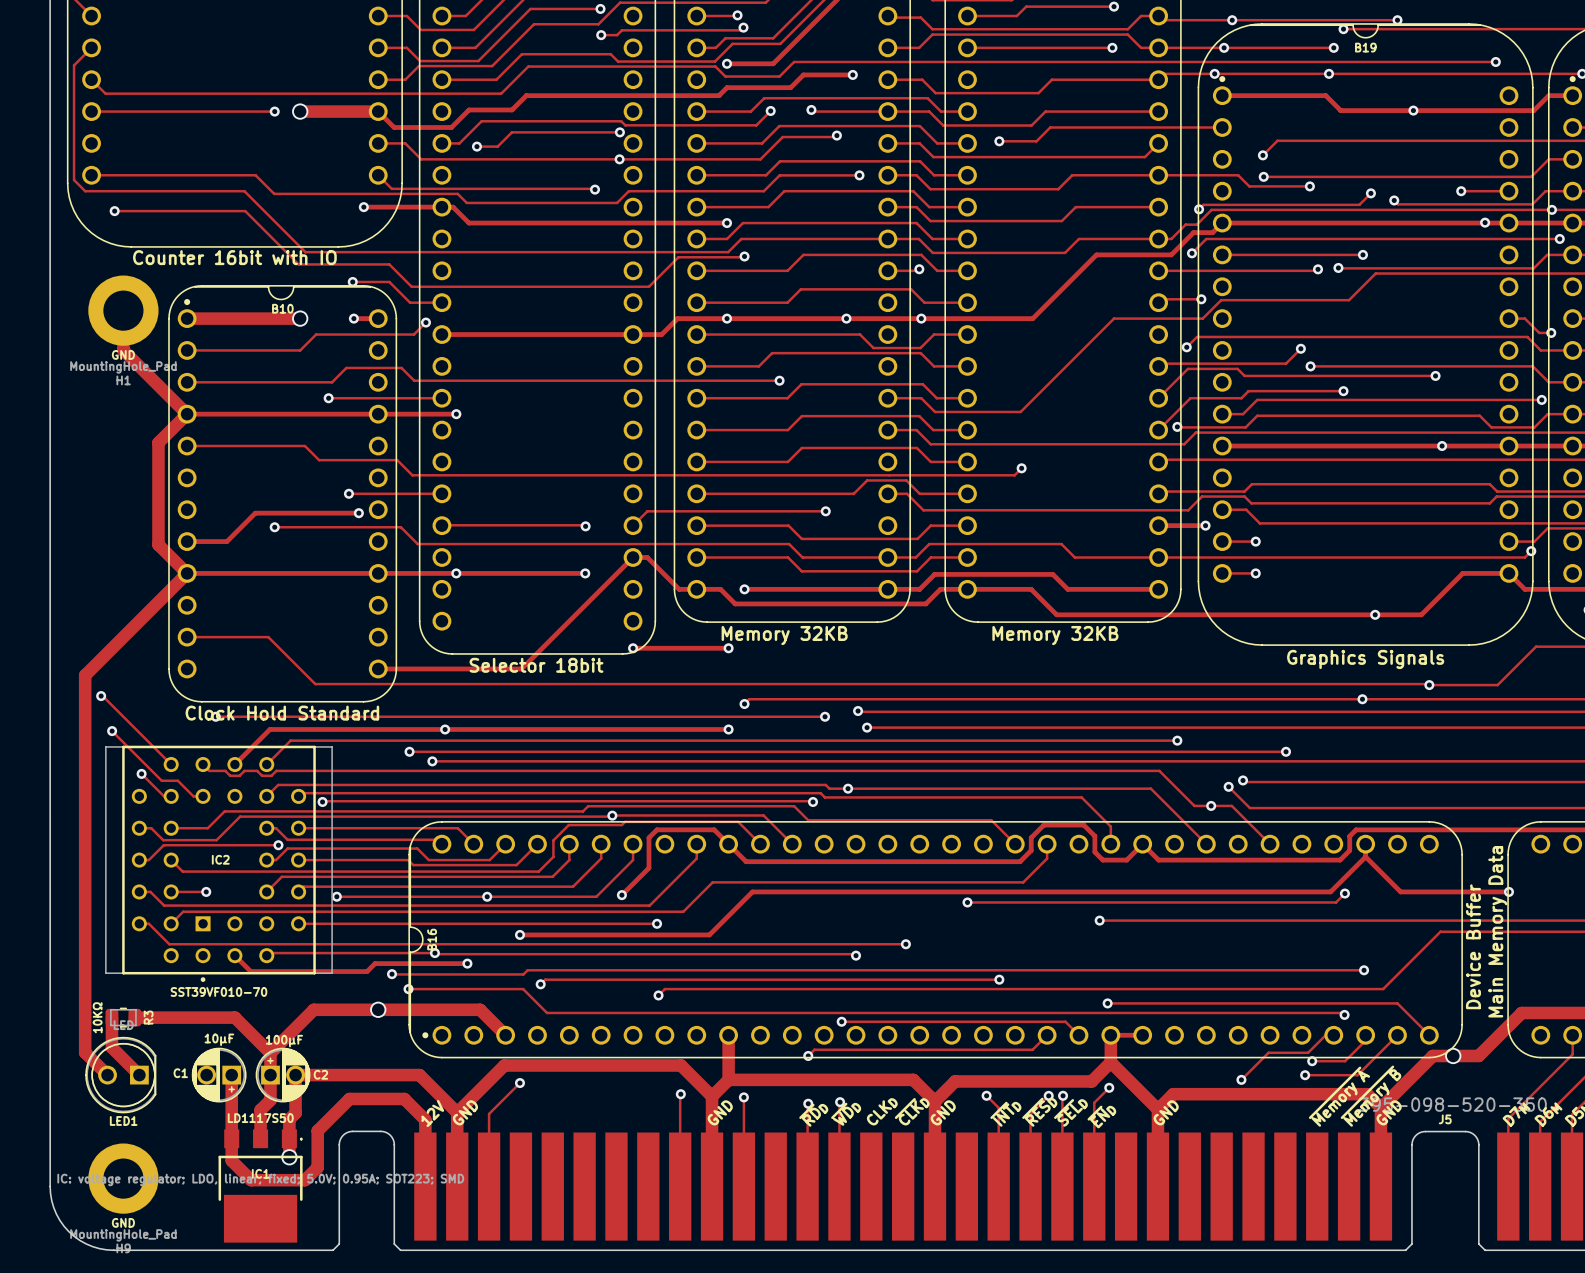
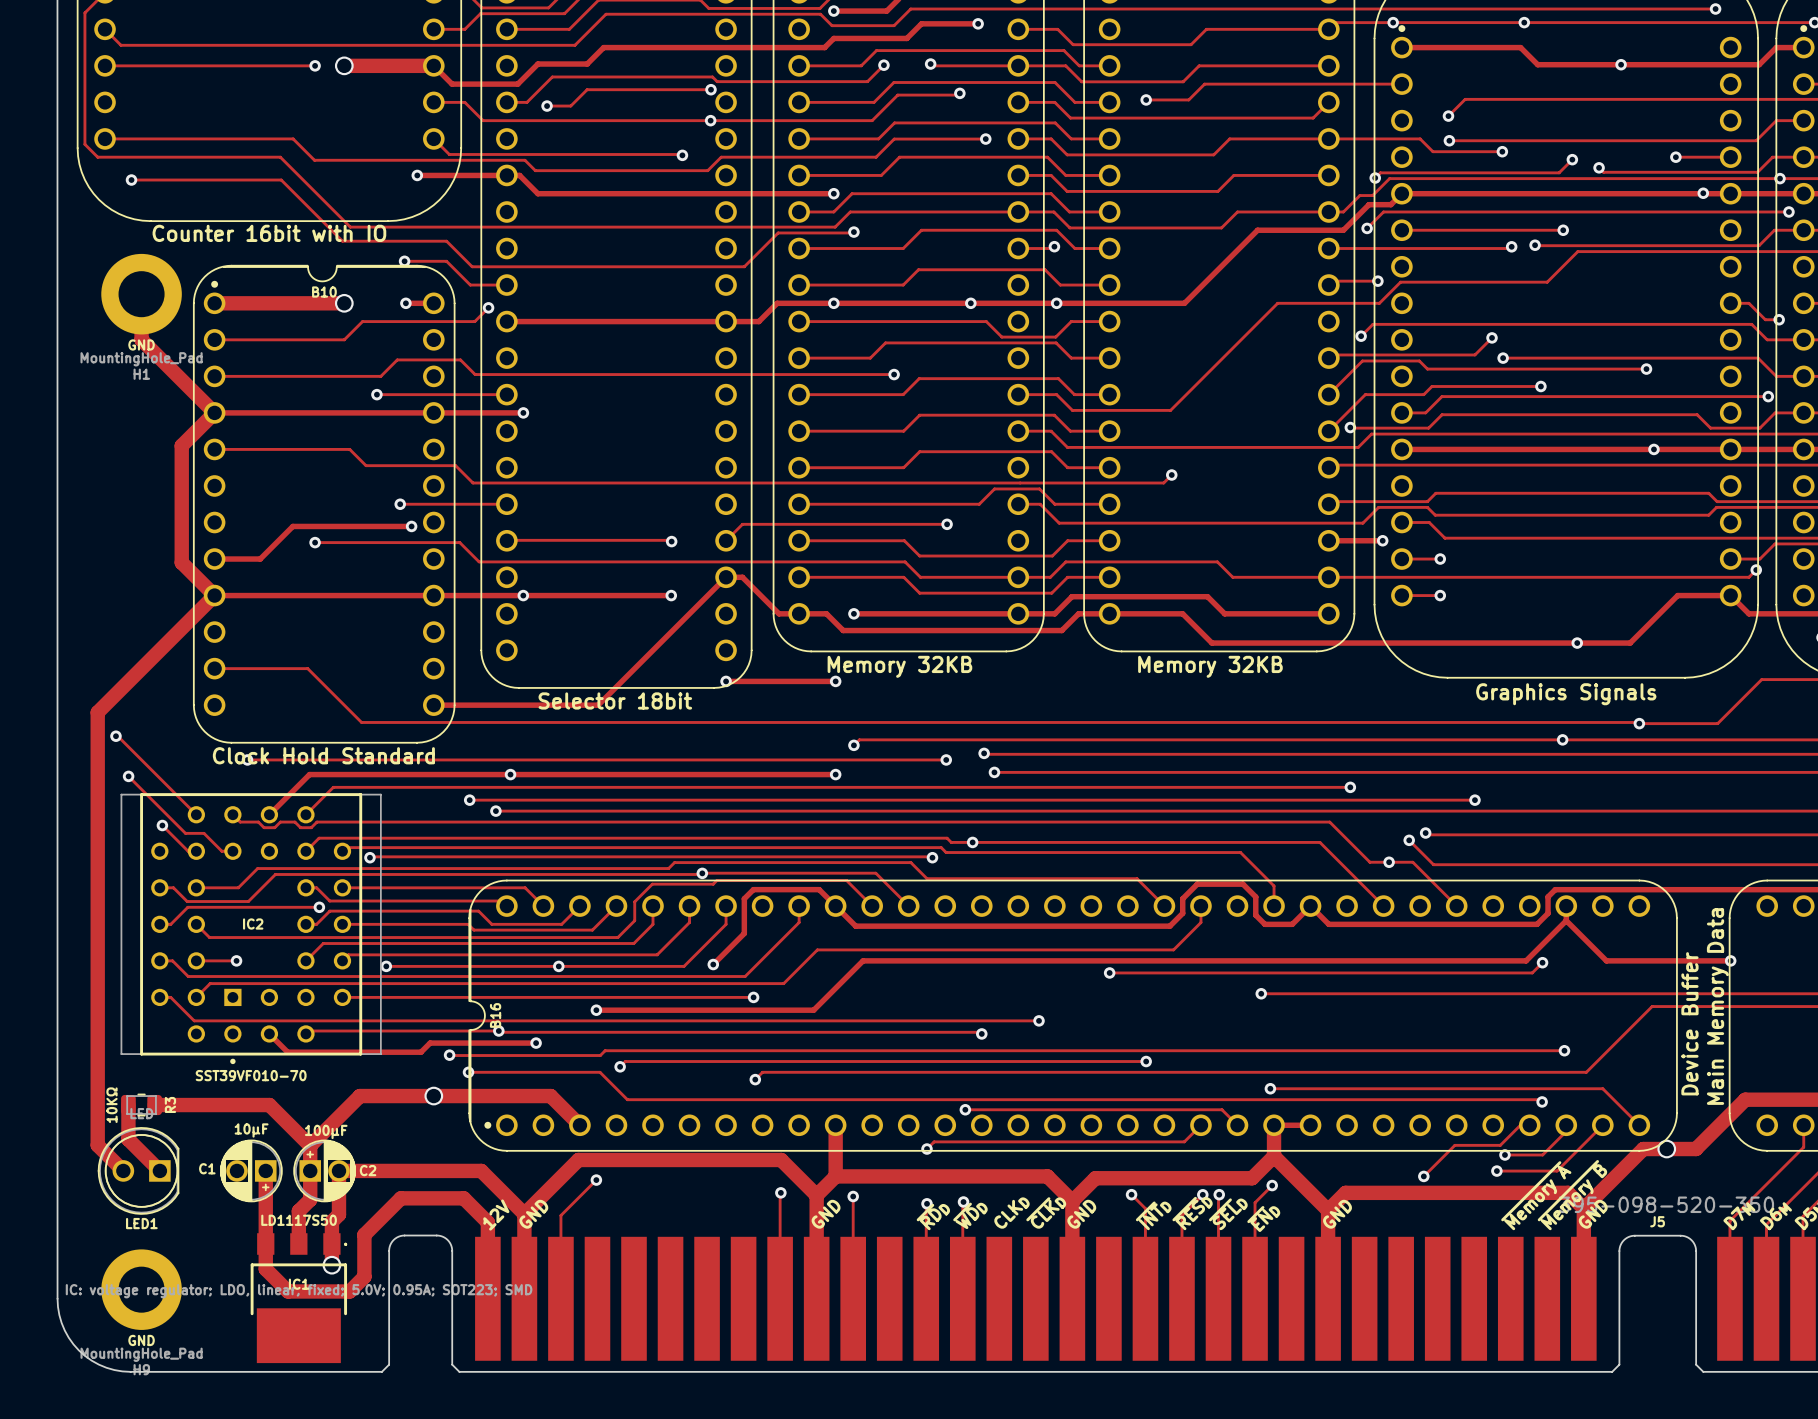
B10 footprint: [168, 285, 397, 703] -> [193, 265, 456, 744]
B16 footprint: [408, 821, 1463, 1059] -> [468, 879, 1678, 1152]

